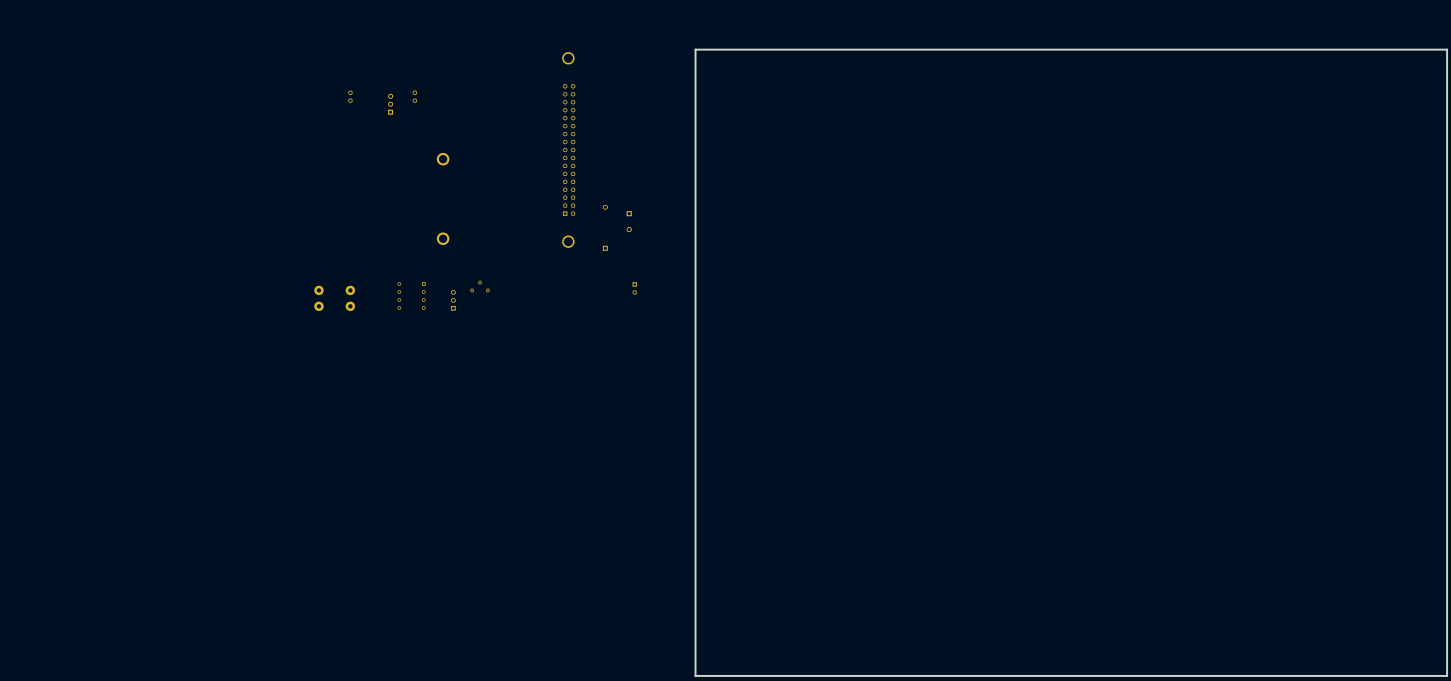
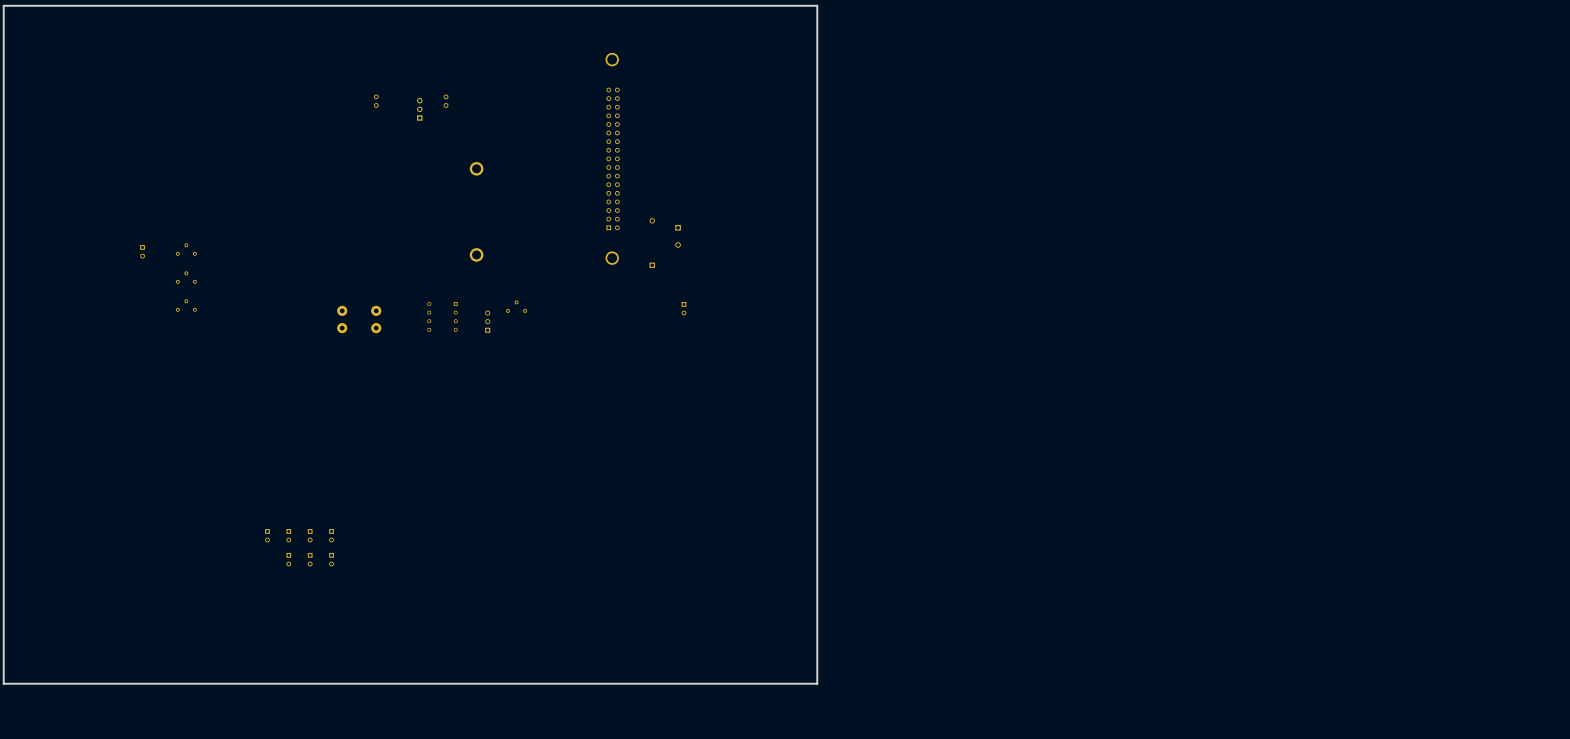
board edge: none -> (817, 5) (3, 5) (3, 683) (817, 683) (817, 5)
board edge: (1447, 49) (695, 49) (695, 675) (1447, 675) (1447, 49) -> none
part: none -> (186, 249)
part: none -> (142, 251)
part: none -> (186, 277)
part: none -> (186, 305)
part: none -> (267, 535)
part: none -> (288, 535)
part: none -> (310, 535)
part: none -> (331, 535)
part: none -> (288, 559)
part: none -> (310, 559)
part: none -> (331, 559)

